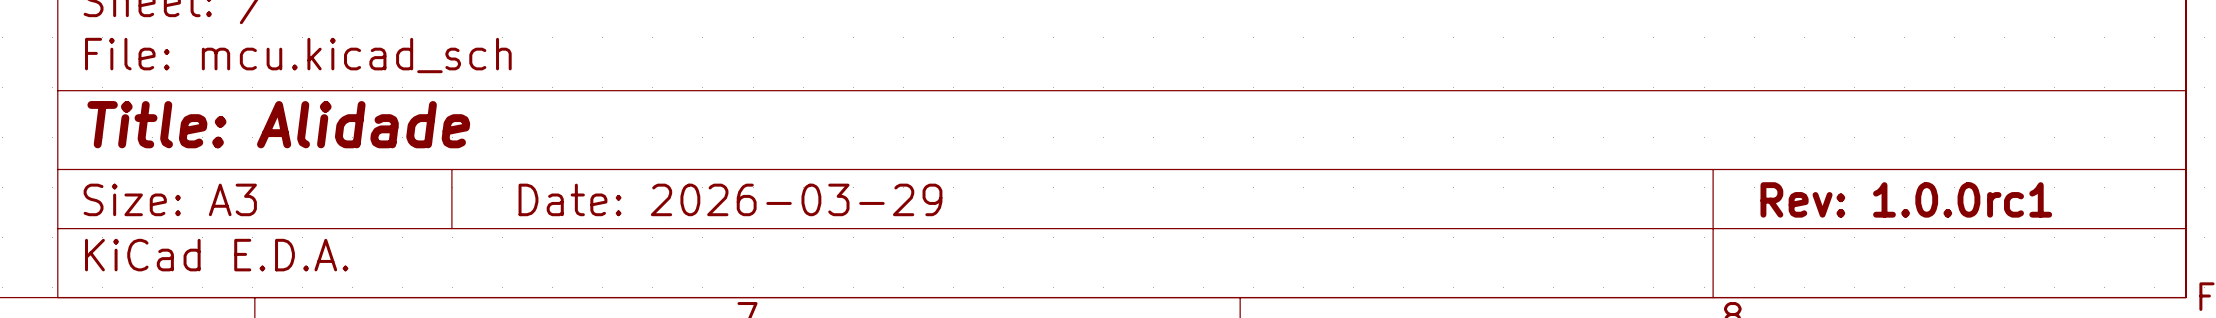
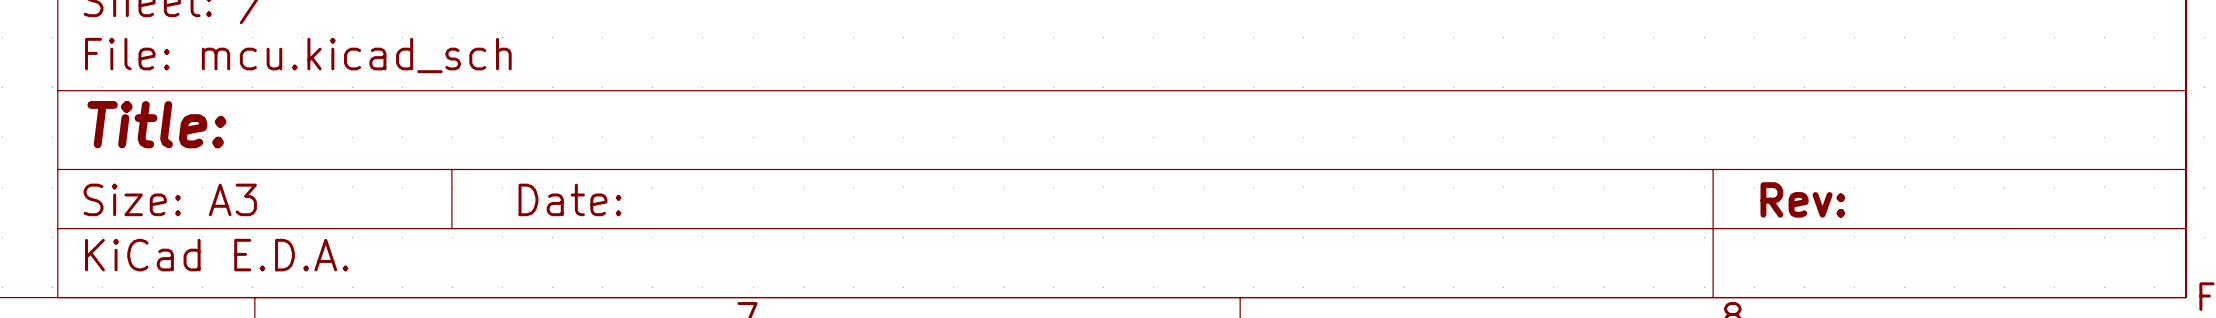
title block: Title: Alidade (278, 124) -> Title: (156, 124)
title block: Date: 2026-03-29 (730, 199) -> Date: (570, 199)
title block: Rev: 1.0.0rc1 (1906, 199) -> Rev: (1802, 199)

